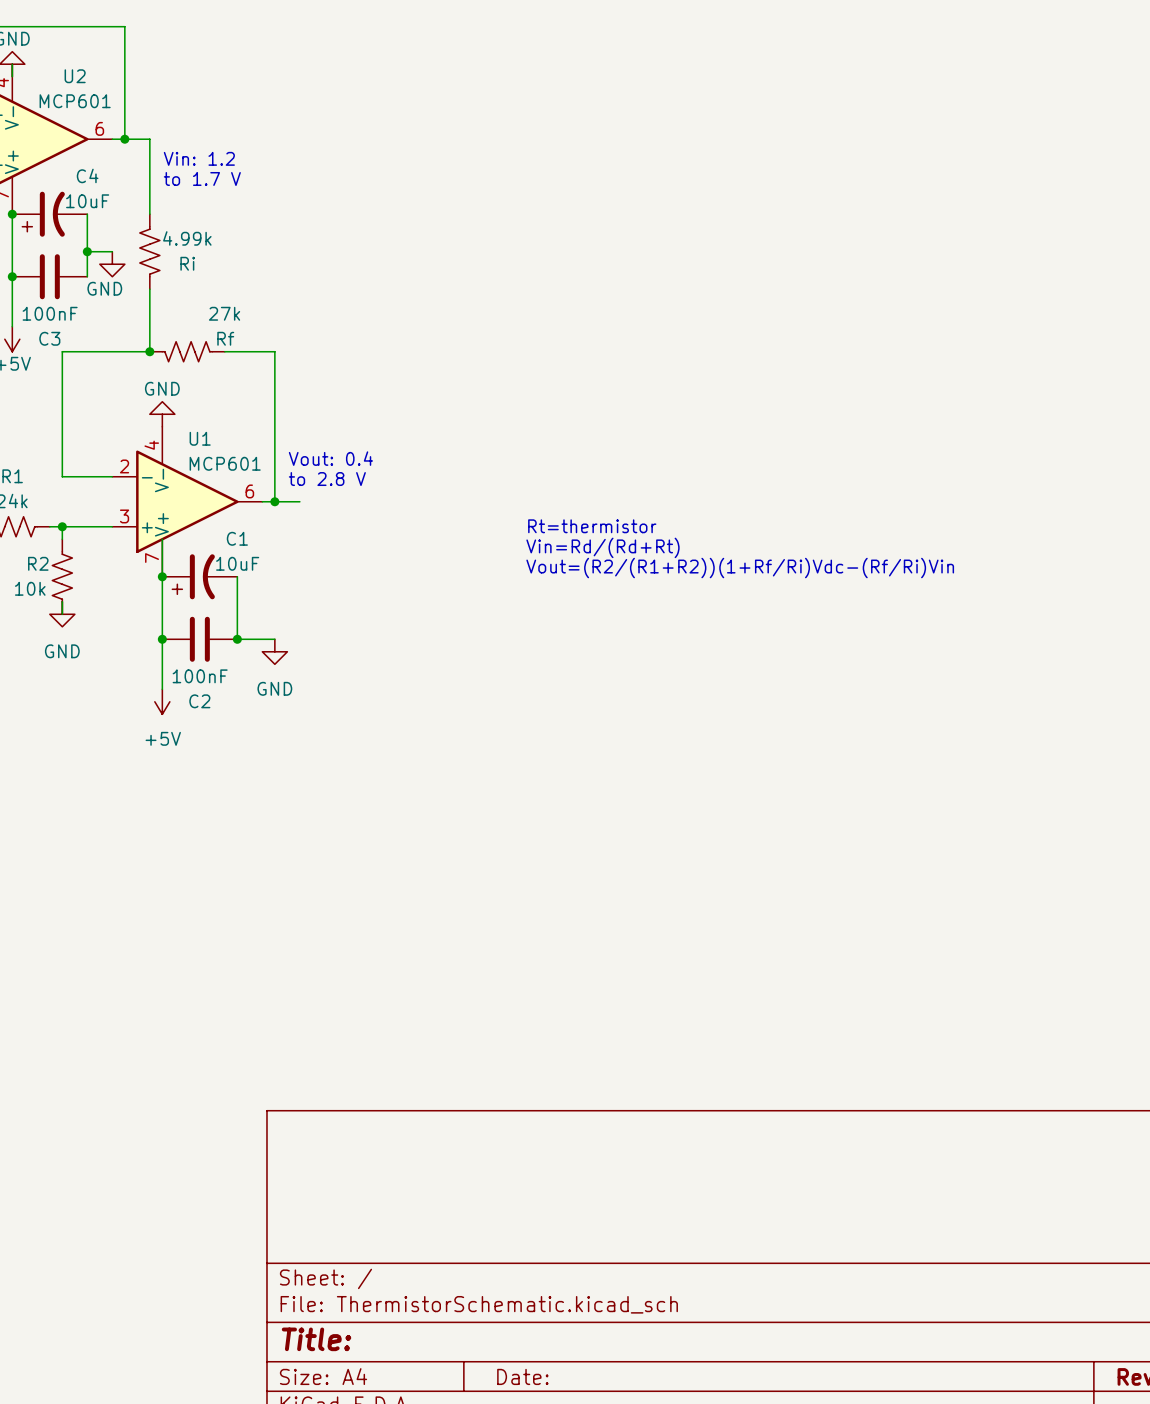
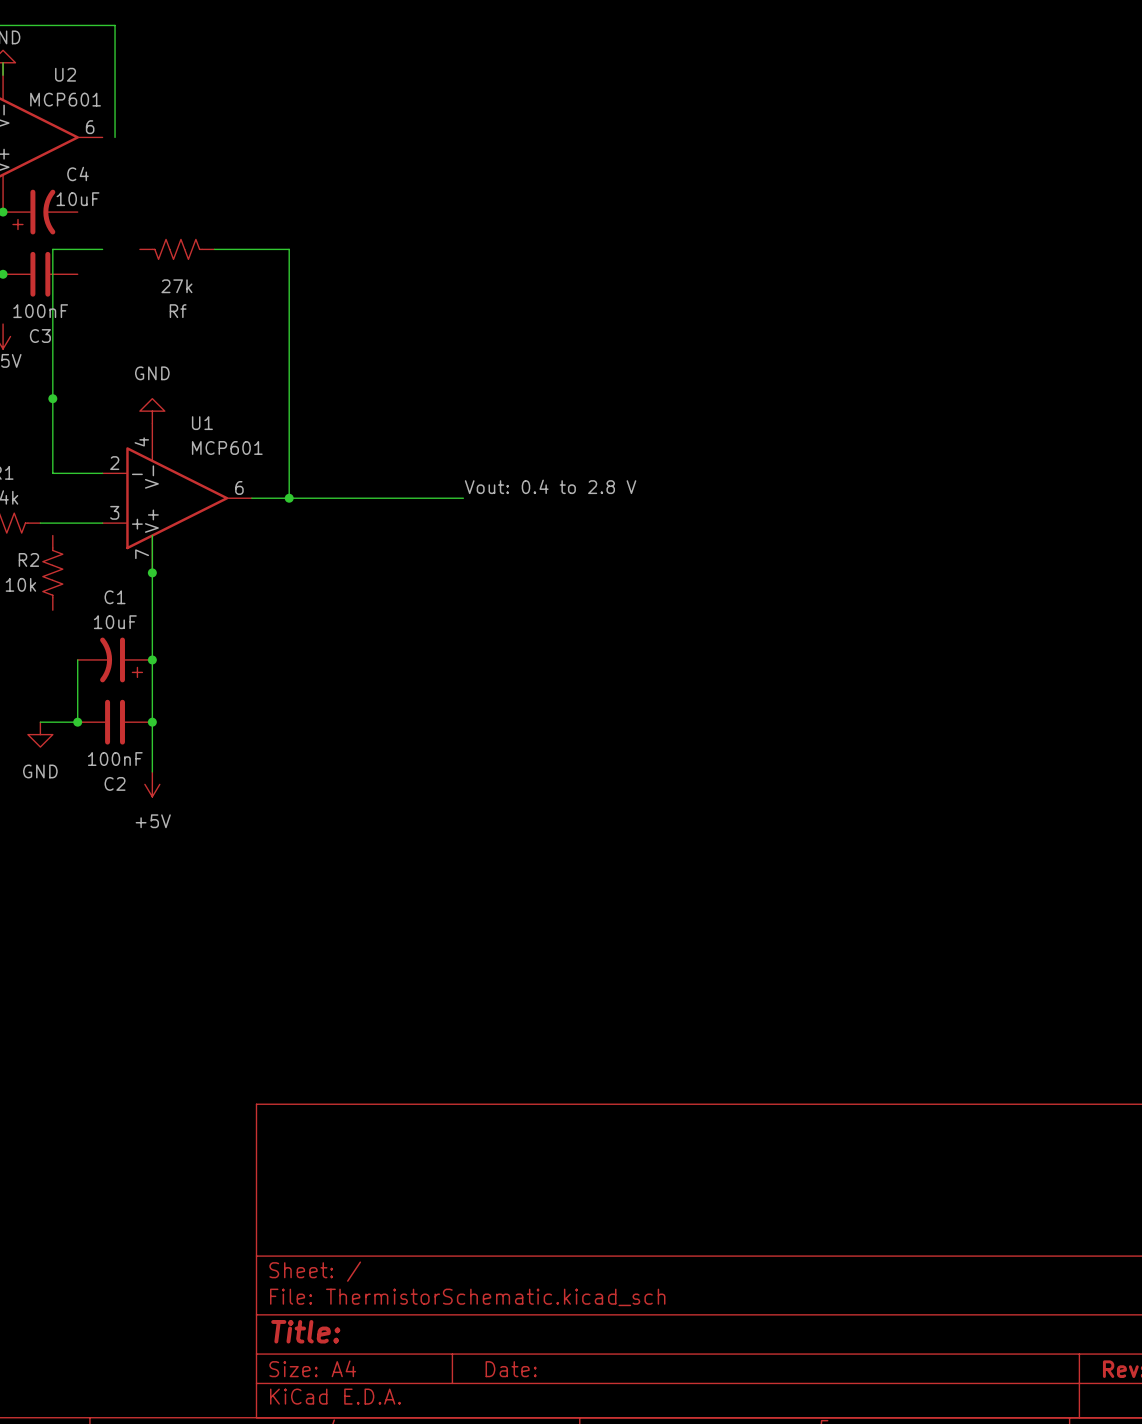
wire: (112, 139) (149, 139) (149, 214) -> none
junction: (124, 139) -> none
text: Vin: 1.2 (199, 158) -> none
text: to 1.7 V (202, 178) -> none
wire: (12, 214) (12, 326) -> none
wire: (87, 214) (87, 276) -> none
junction: (87, 251) -> none
Ri: 4.99k (149, 251) -> none
wire: none -> (214, 249) (289, 249) (289, 498) (463, 498)
power symbol: GND (112, 264) -> none
wire: (149, 289) (149, 351) (62, 351) -> (77, 249) (52, 249) (52, 348)
Rf value position: 27k (224, 313) -> 27k (176, 286)
Rf name position: Rf (225, 338) -> Rf (178, 311)
junction: (149, 351) -> none
Rf position: (187, 351) -> (177, 249)
wire: (224, 351) (274, 351) (274, 501) -> none
power symbol text position: GND (162, 388) -> GND (152, 373)
junction: none -> (52, 398)
U1 name position: U1 (200, 438) -> U1 (202, 423)
text: Vout: 0.4 (330, 458) -> none
U1 value position: MCP601 (225, 463) -> MCP601 (227, 447)
text: to 2.8 V (327, 479) -> none
label: none -> Vout: 0.4 to 2.8 V (550, 486)
junction position: (274, 501) -> (289, 498)
wire: (62, 526) (62, 539) -> none
junction: (62, 526) -> none
text: Rt=thermistor (592, 526) -> none
C1 name position: C1 (237, 538) -> C1 (115, 597)
text: Vin=Rd/(Rd+Rt) (602, 547) -> none
C1 value position: 10uF (237, 563) -> 10uF (115, 622)
text: Vout=(R2/(R1+R2))(1+Rf/Ri)Vdc-(Rf/Ri)Vin (740, 568) -> none
C1 flip: as is (193, 576) -> left-right (121, 659)
C1 position: (199, 576) -> (115, 659)
wire: (237, 576) (237, 639) (274, 639) -> none
power symbol: GND (62, 614) -> none
junction position: (162, 639) -> (152, 659)
C2 position: (199, 639) -> (115, 722)
junction: (237, 639) -> none
power symbol: GND (274, 651) -> none
wire: none -> (77, 659) (77, 722) (40, 722)
wire: none -> (152, 684) (152, 771)
power symbol position: +5V (162, 701) -> +5V (152, 784)
junction: none -> (77, 722)
junction: none -> (152, 722)
power symbol: none -> GND (40, 734)

